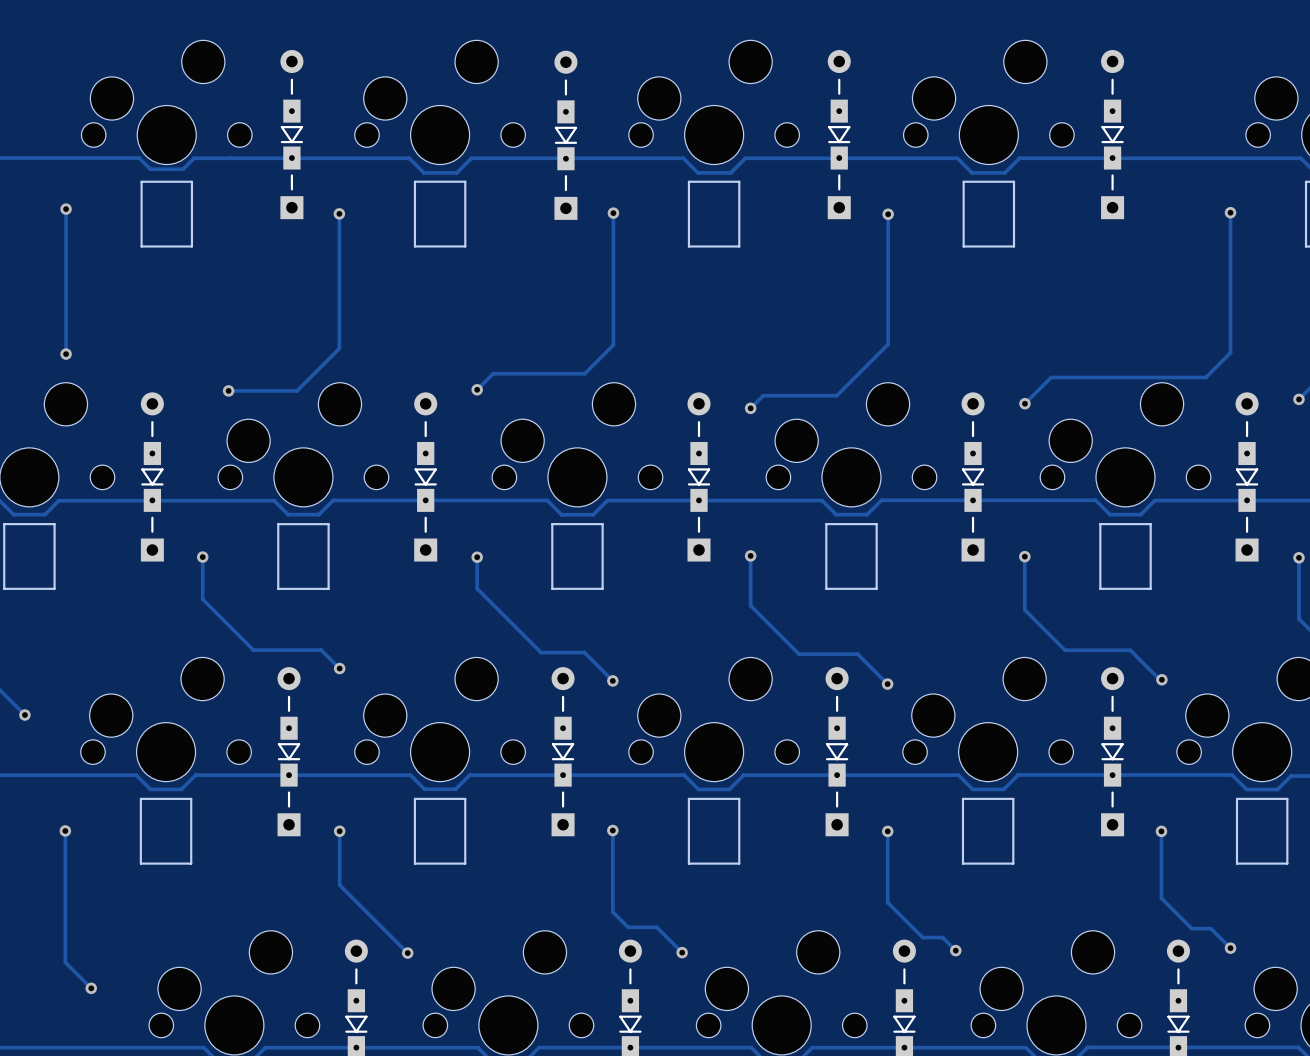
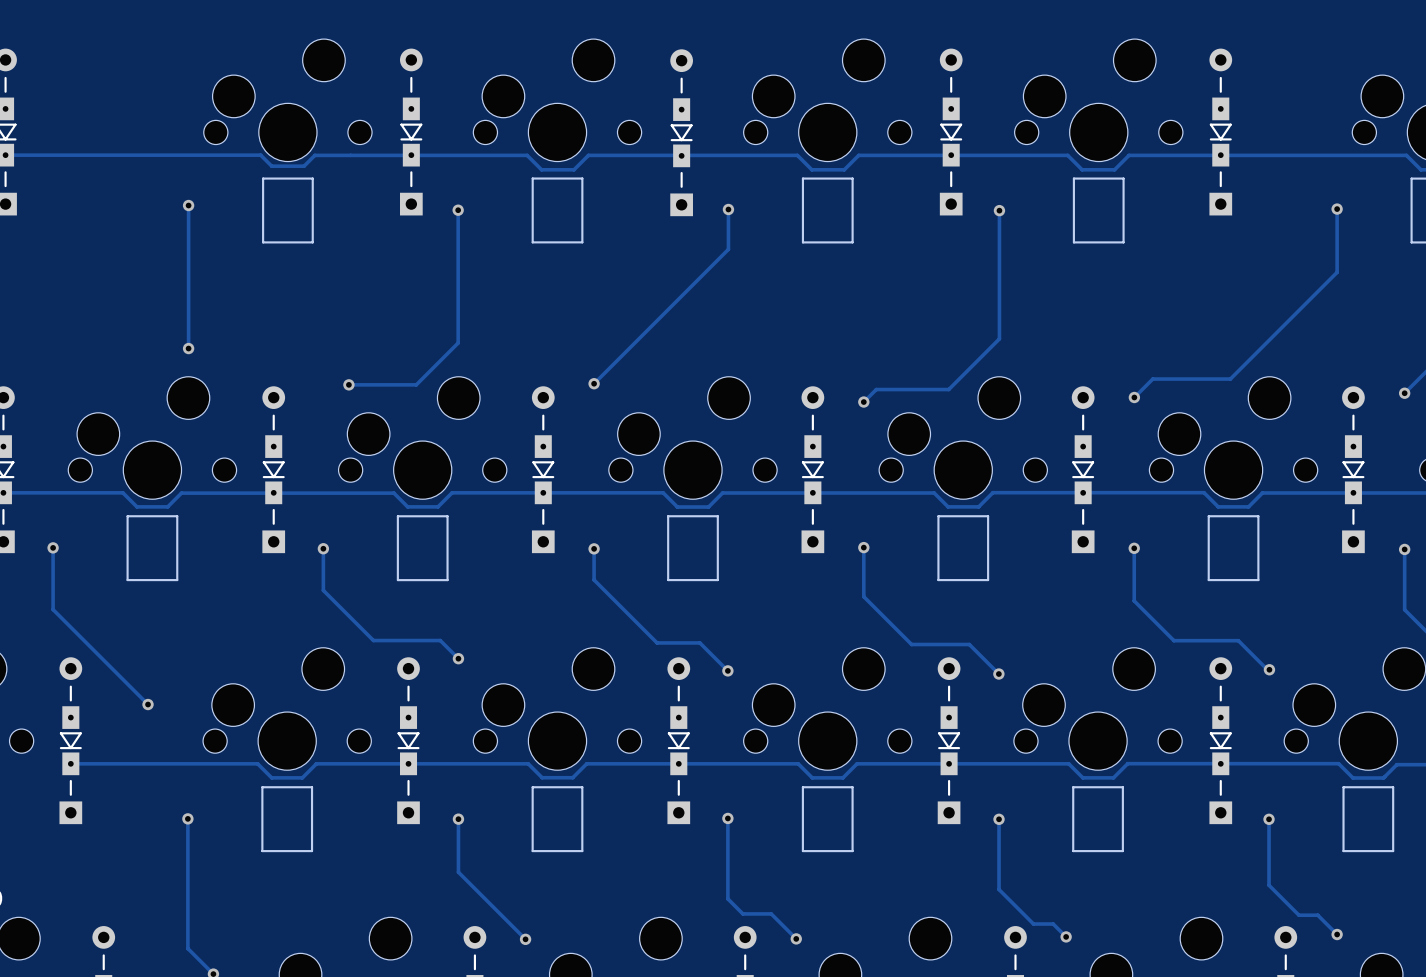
track: (613, 253) (613, 345) (584, 373) (493, 373) -> (728, 249) (609, 367)
track: (1230, 276) (1230, 352) (1205, 377) (1051, 377) (1043, 385) -> (1337, 272) (1230, 379) (1152, 379)

